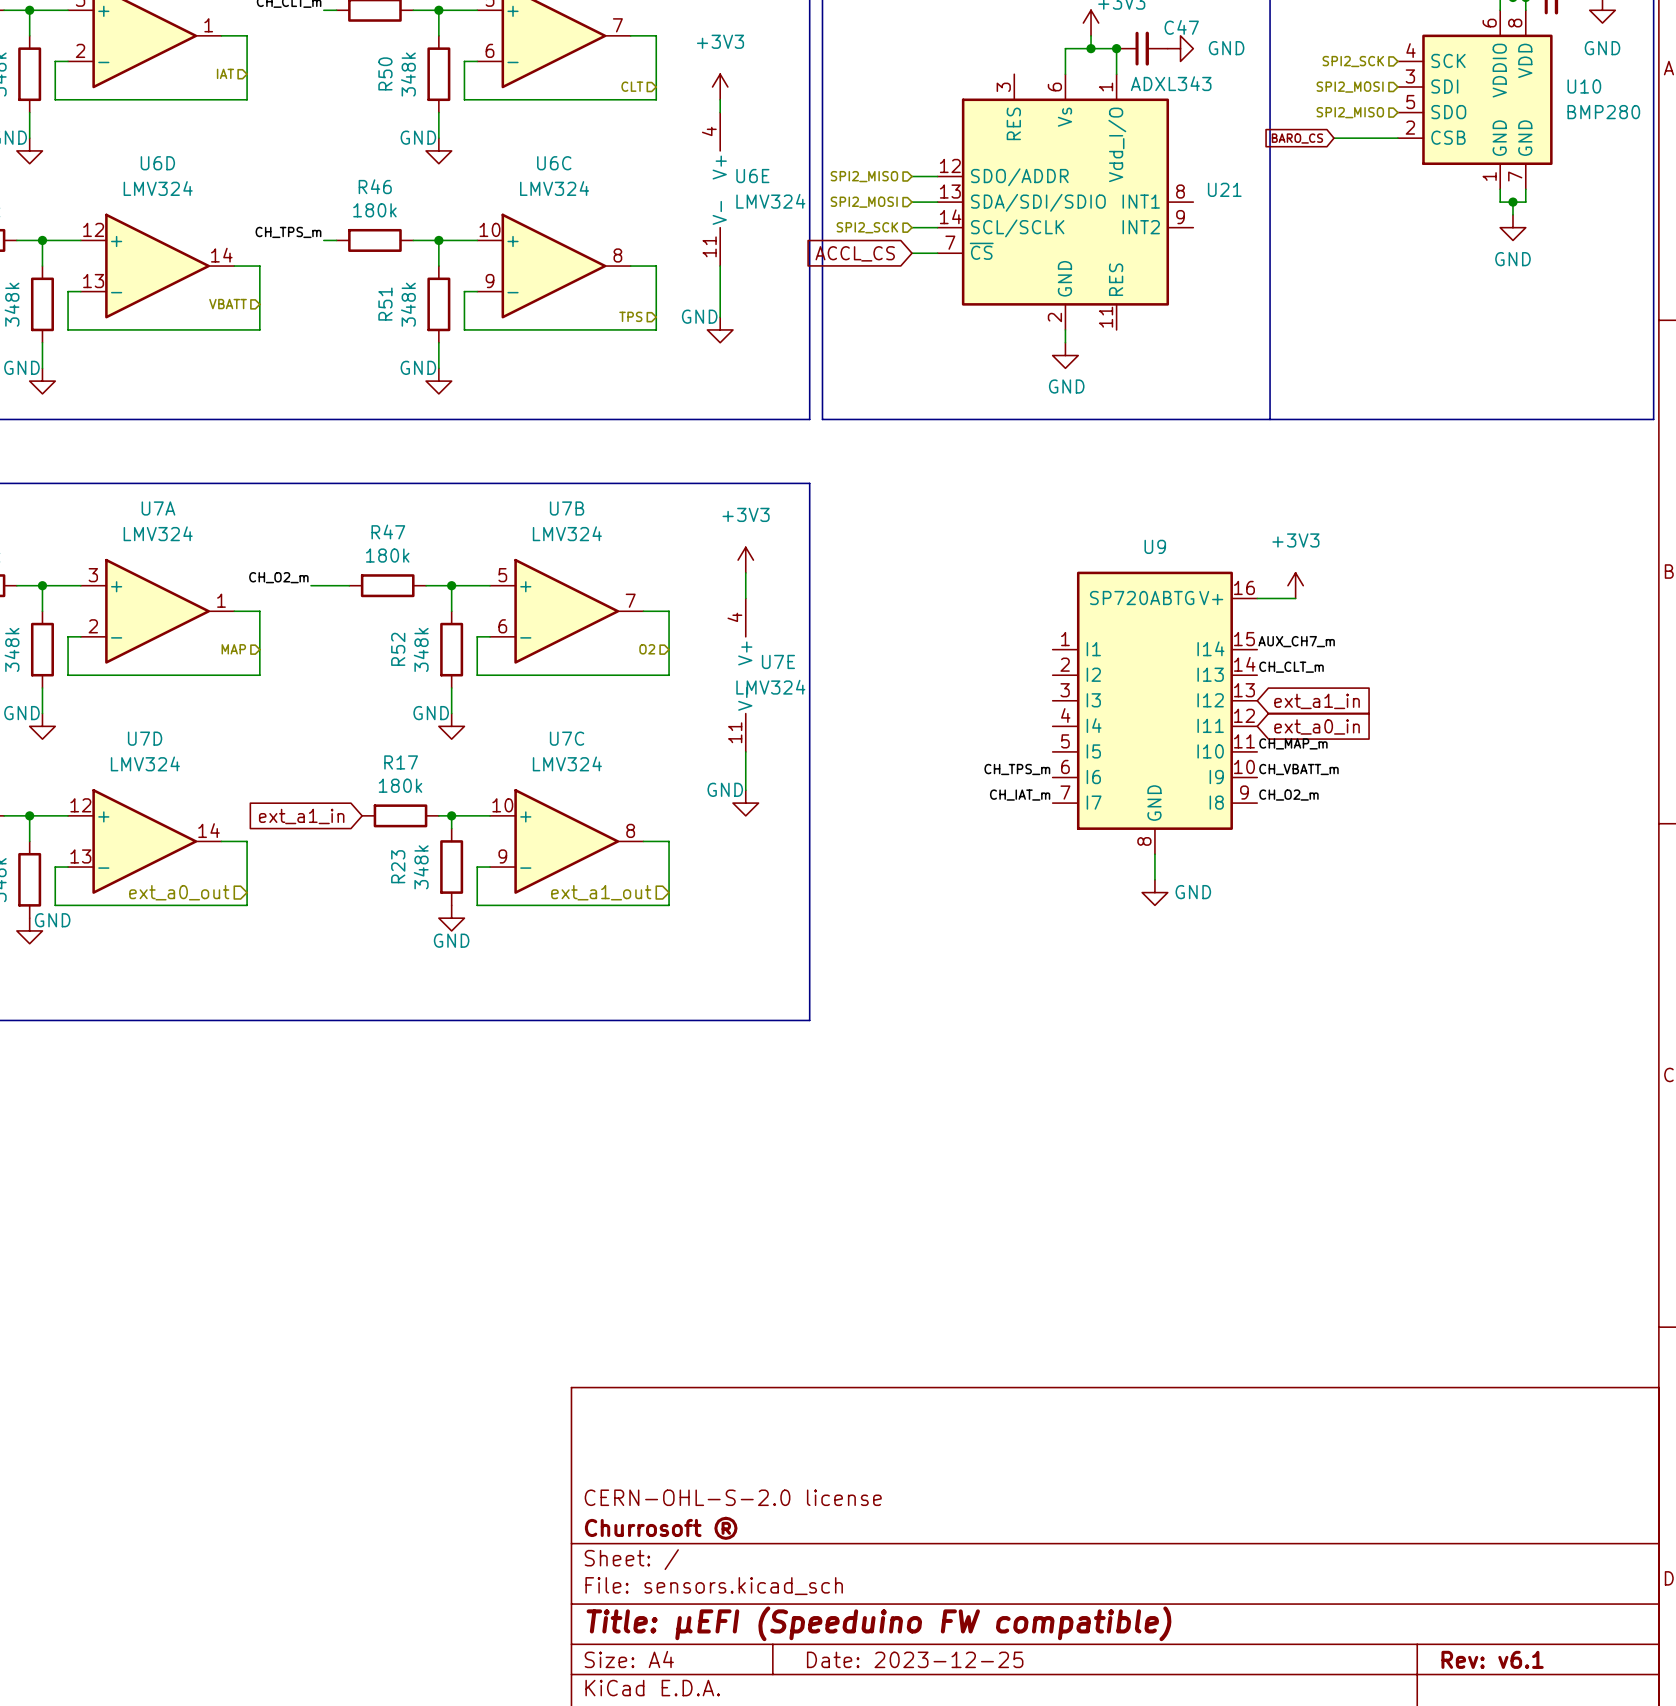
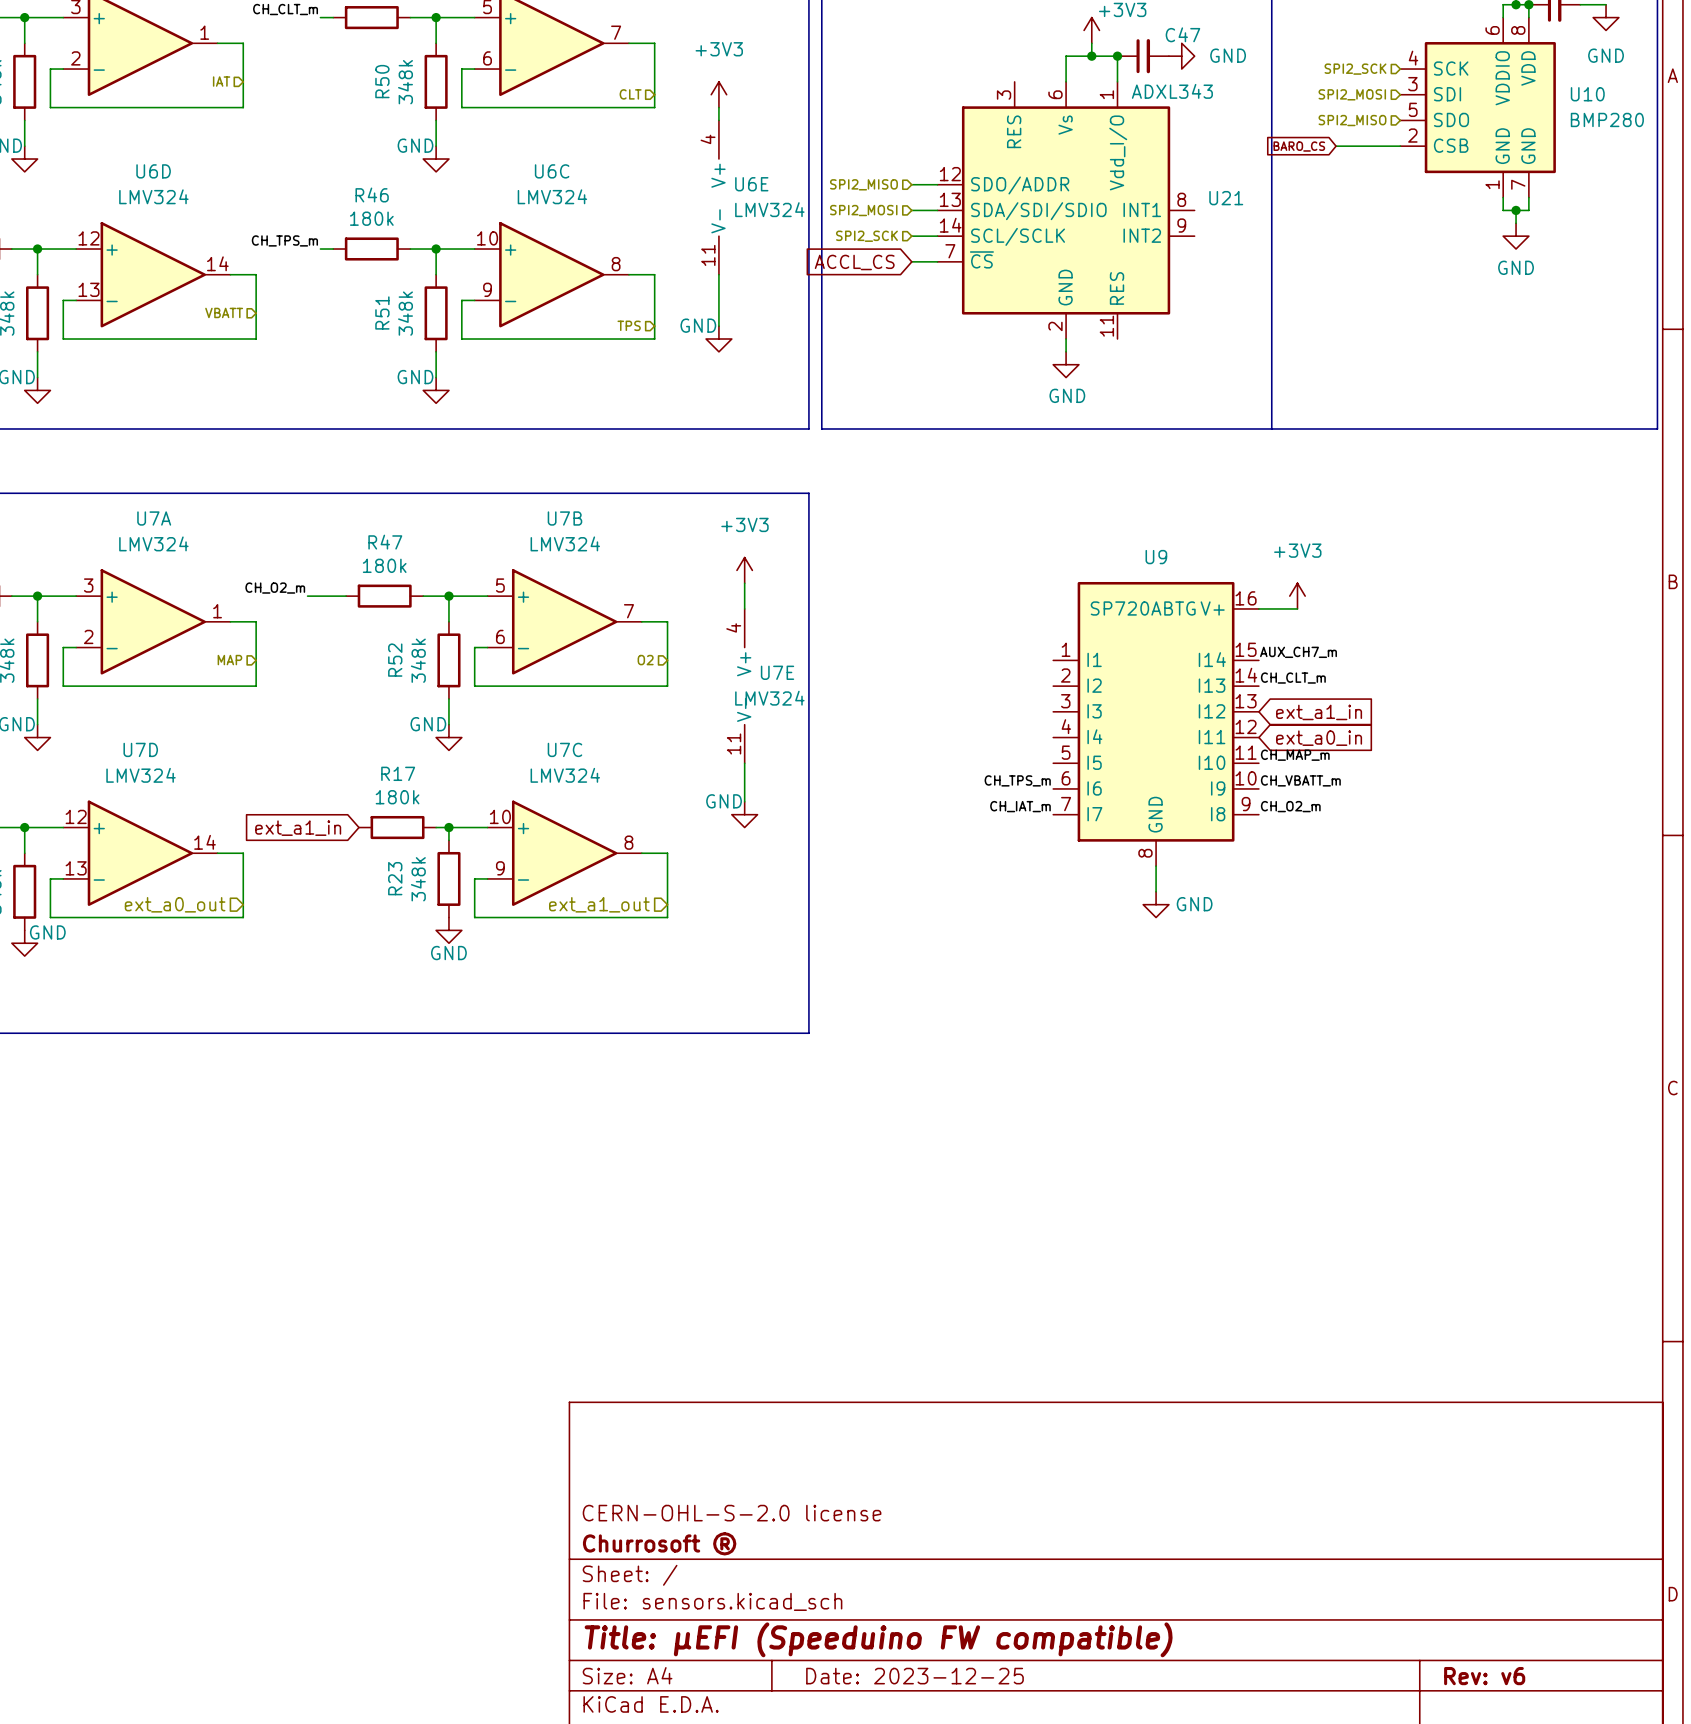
title block: Rev: v6.1 (1492, 1659) -> Rev: v6 (1484, 1676)

